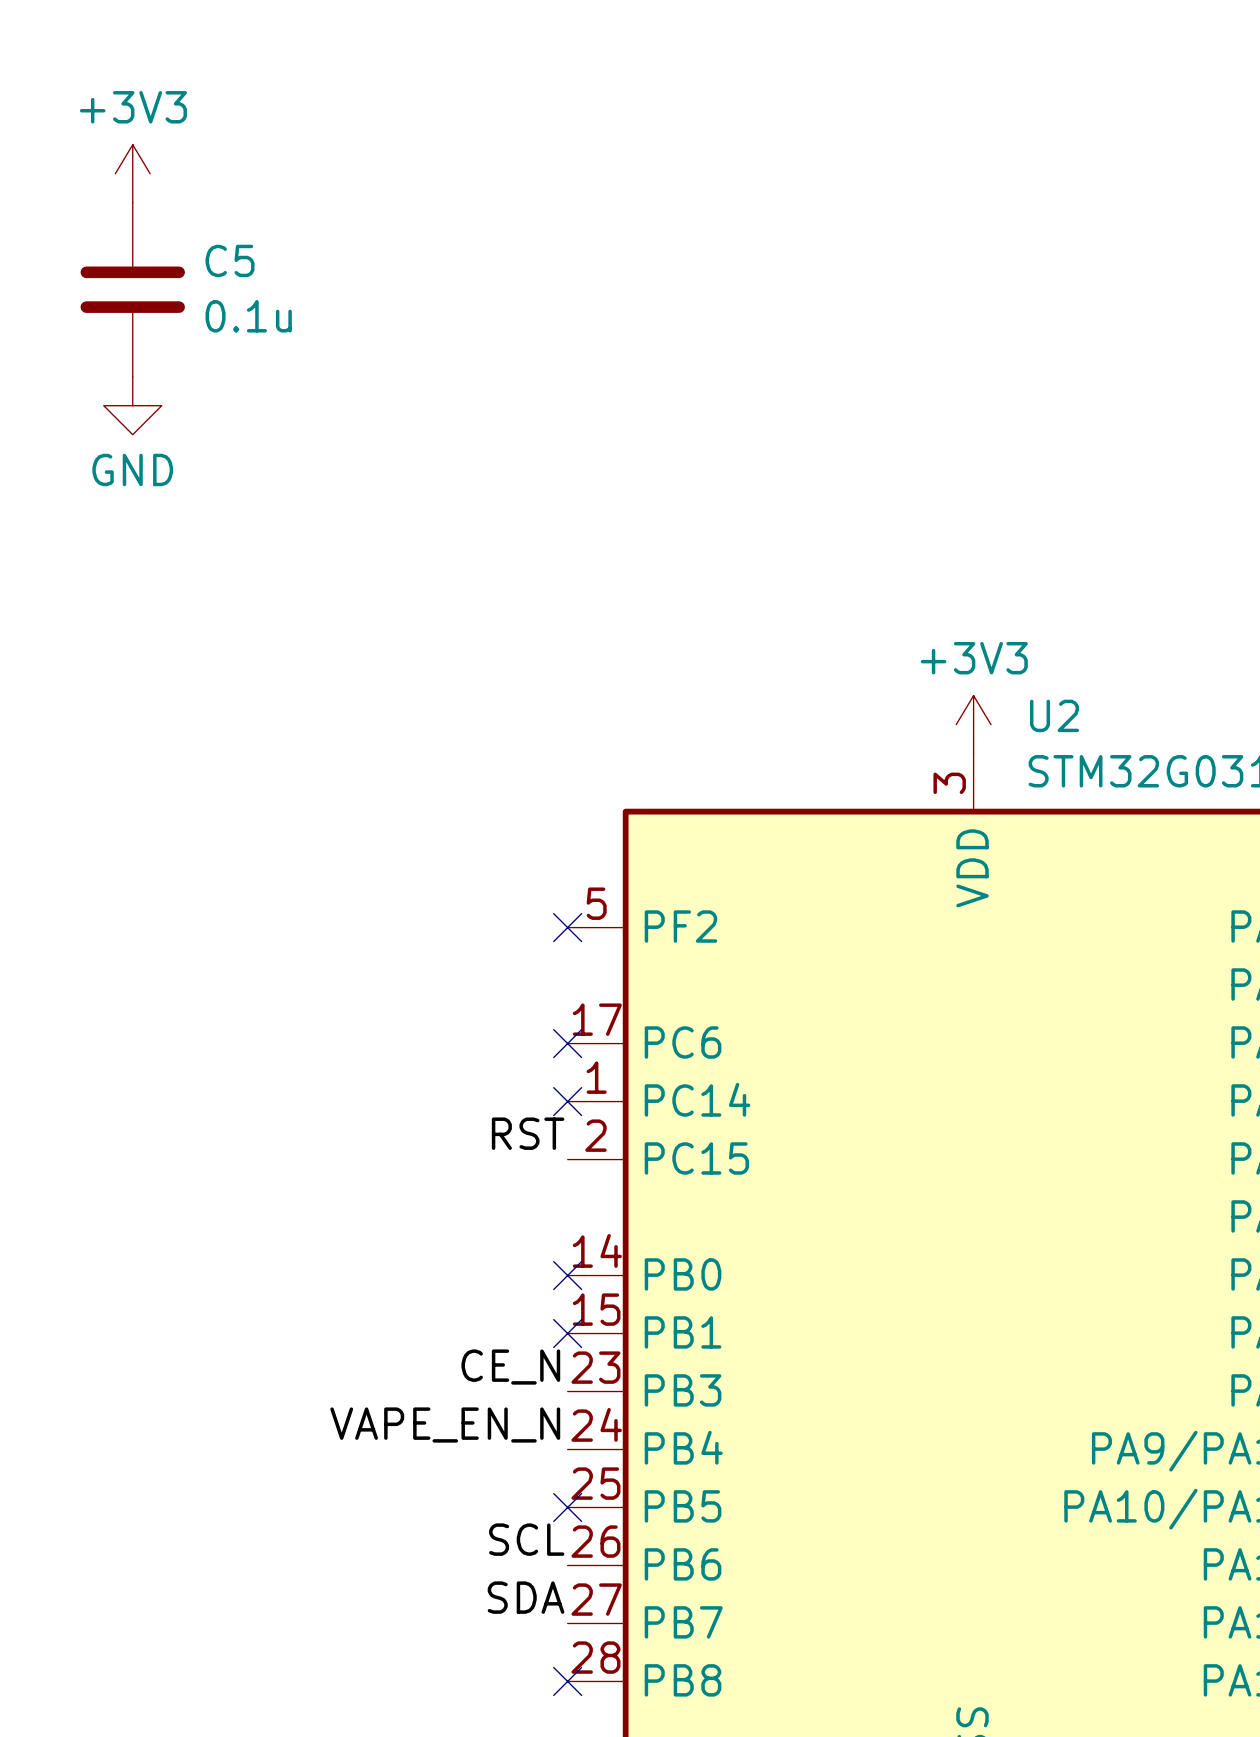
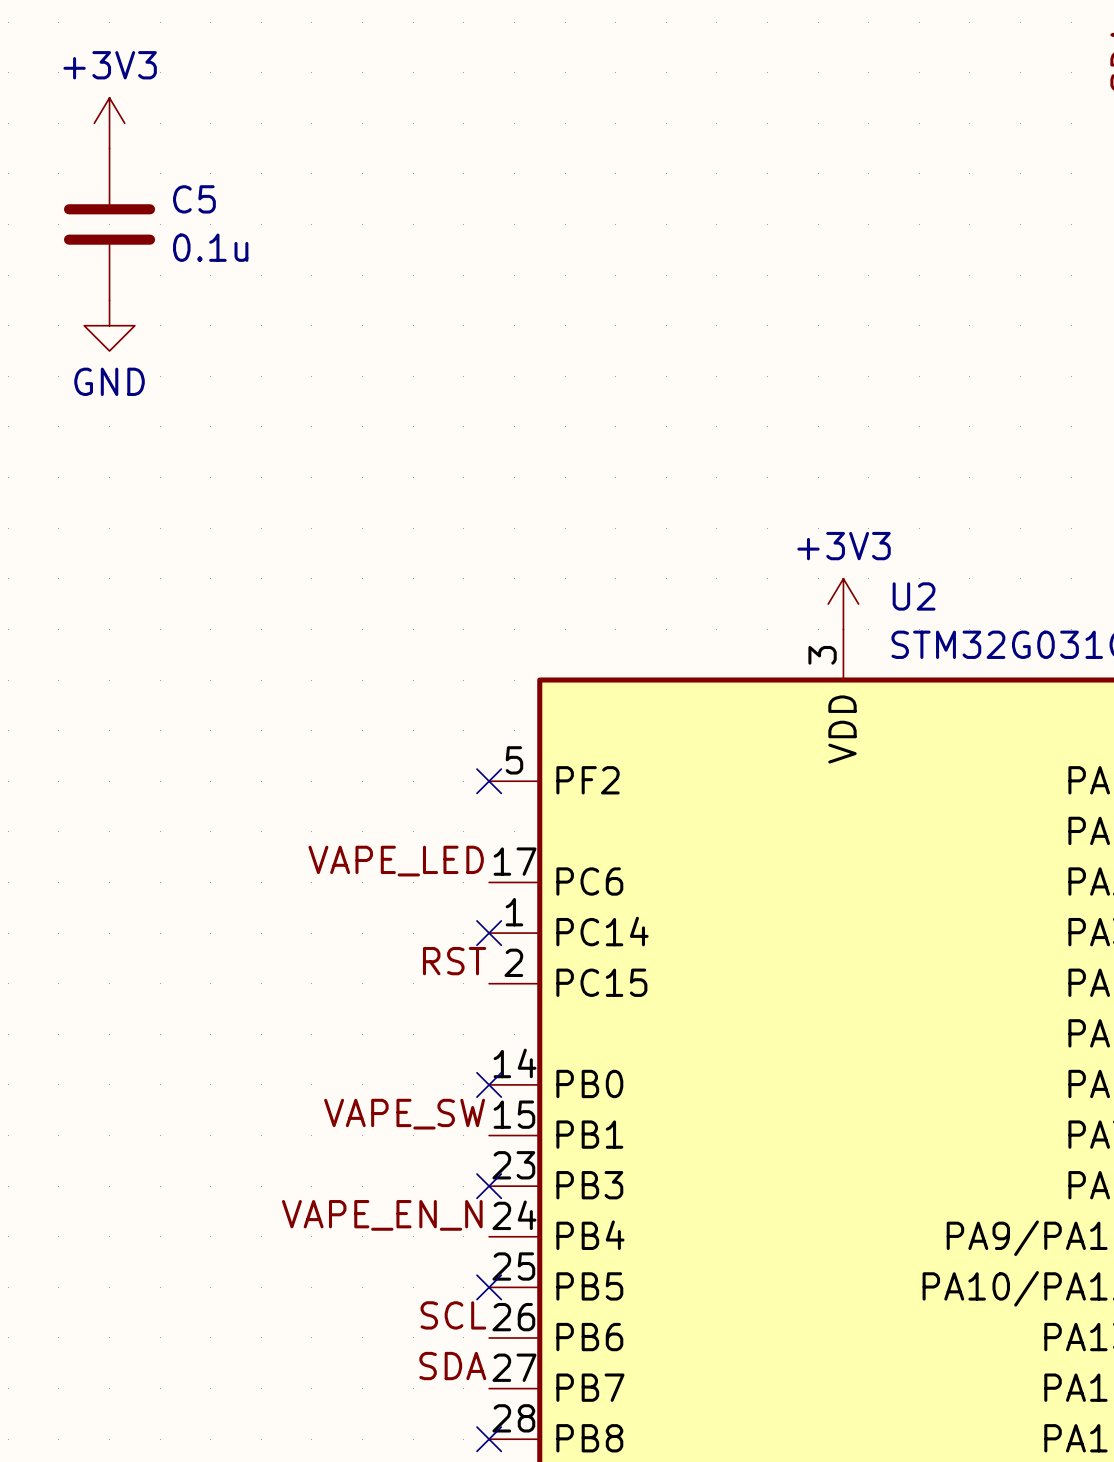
label: none -> VAPE_LED (396, 861)
no-connect mark: (567, 1043) -> none
label: none -> VAPE_SW (404, 1114)
no-connect mark position: (567, 1333) -> (489, 1186)
label: CE_N (510, 1367) -> none

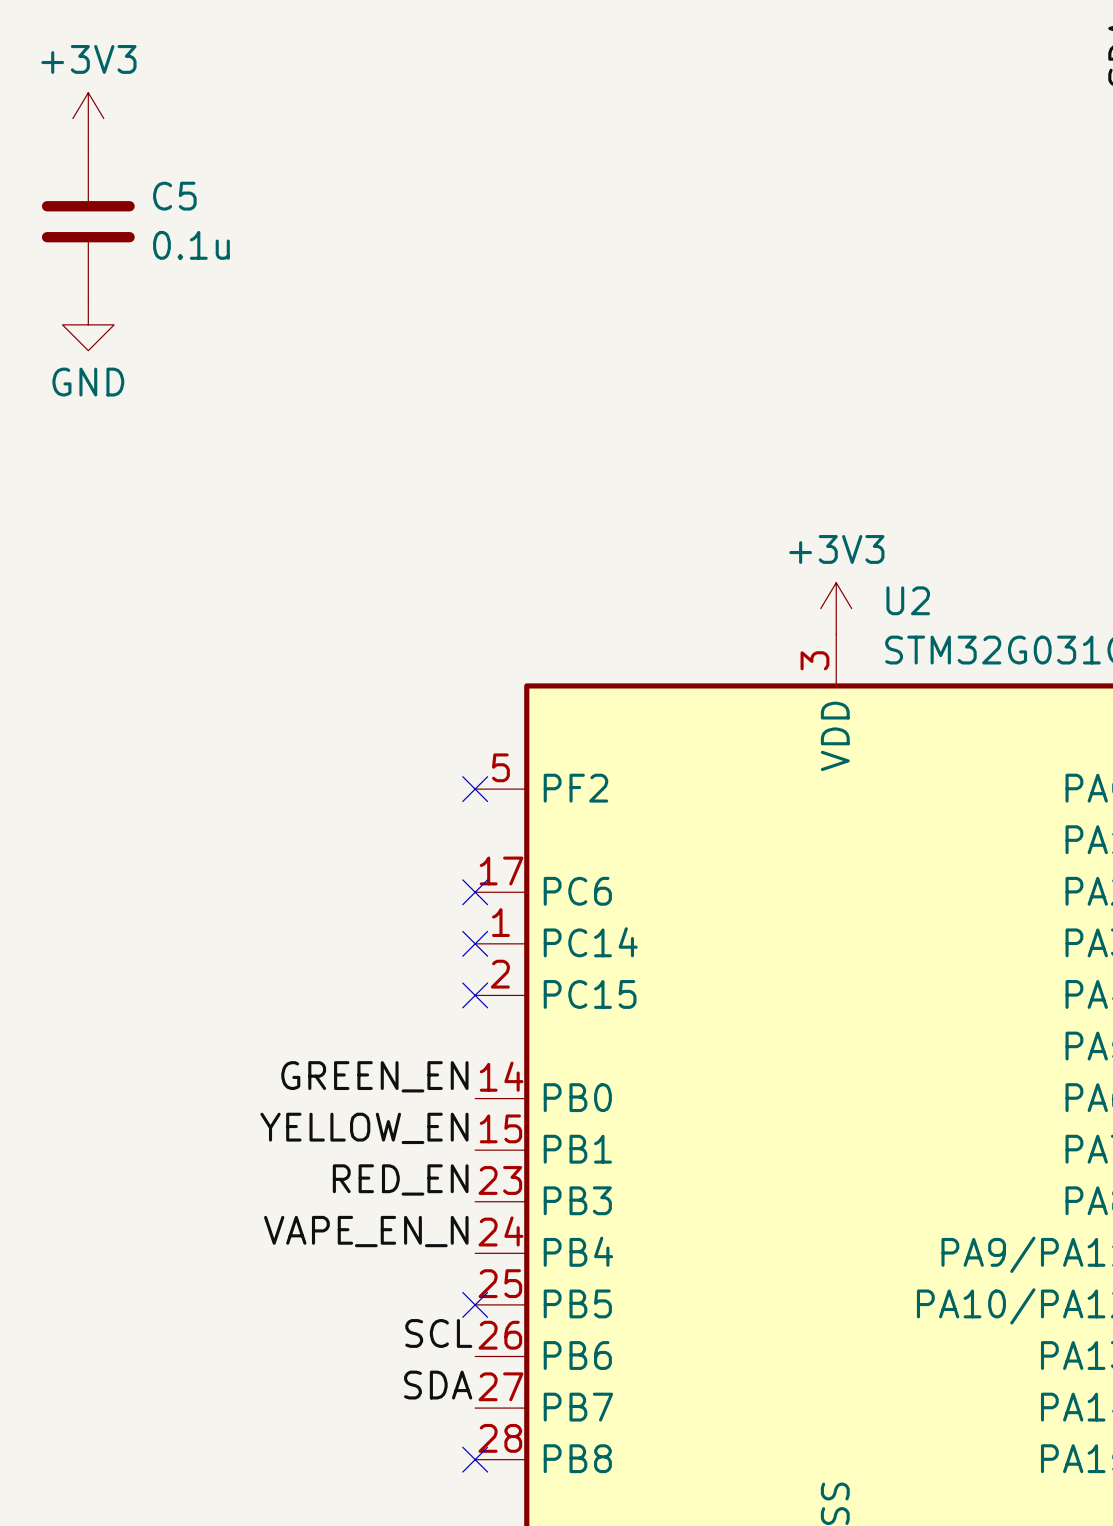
label: VAPE_LED (396, 861) -> none
no-connect mark: none -> (475, 892)
label: RST (454, 961) -> none
no-connect mark: none -> (475, 995)
label: none -> GREEN_EN (374, 1076)
no-connect mark: (489, 1084) -> none
label: VAPE_SW (404, 1114) -> YELLOW_EN (364, 1128)
label: none -> RED_EN (400, 1179)
no-connect mark: (489, 1186) -> none

